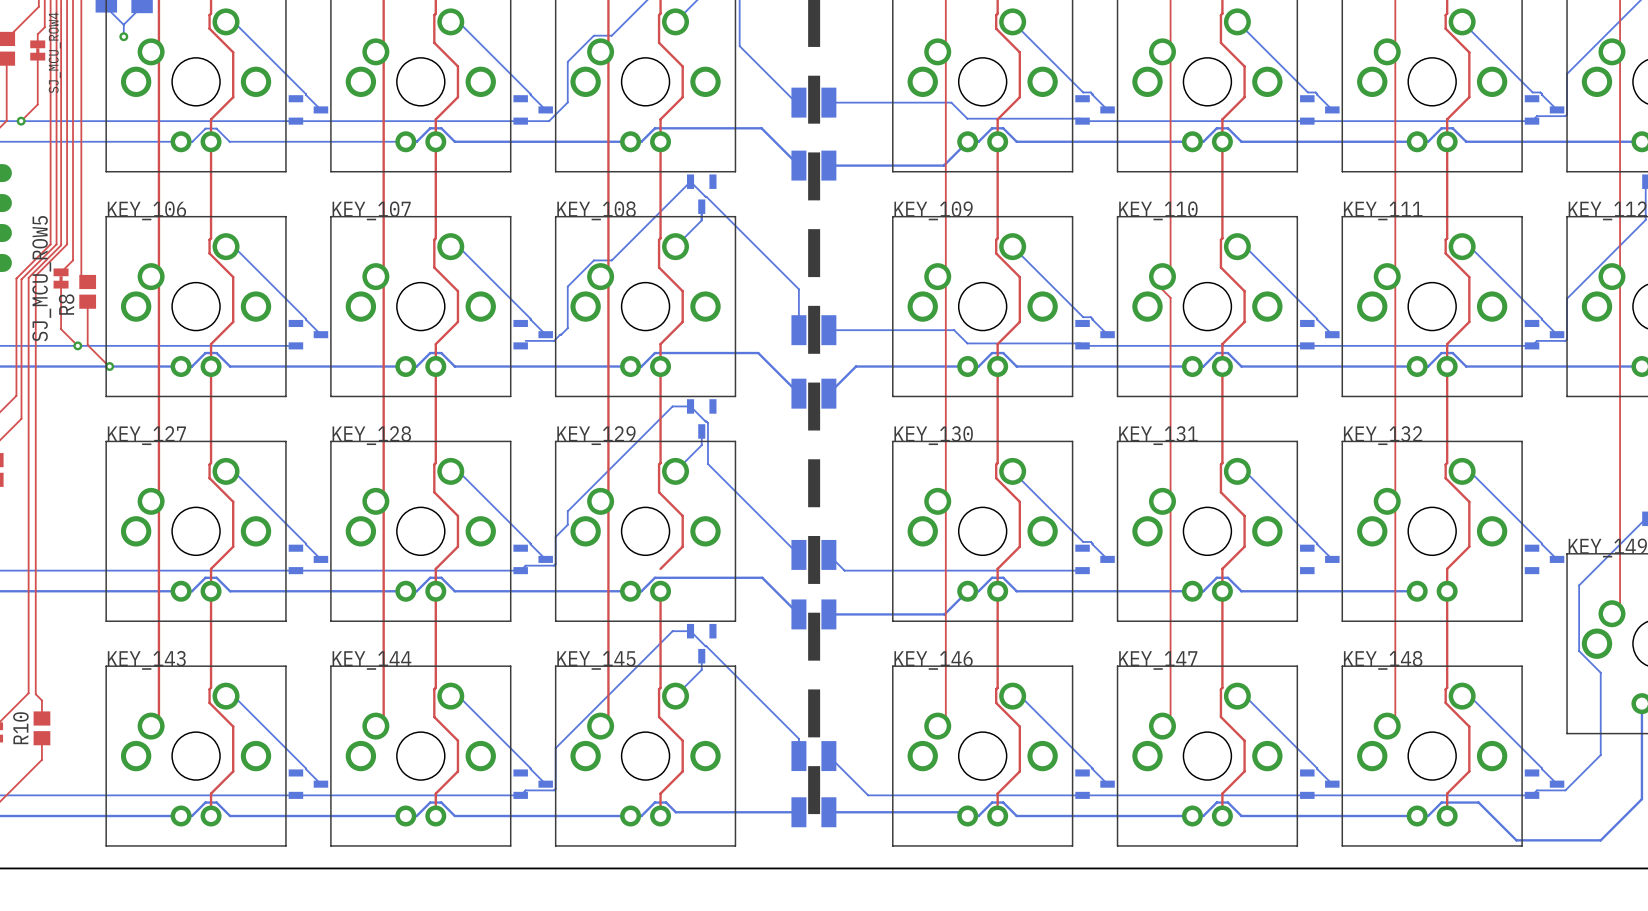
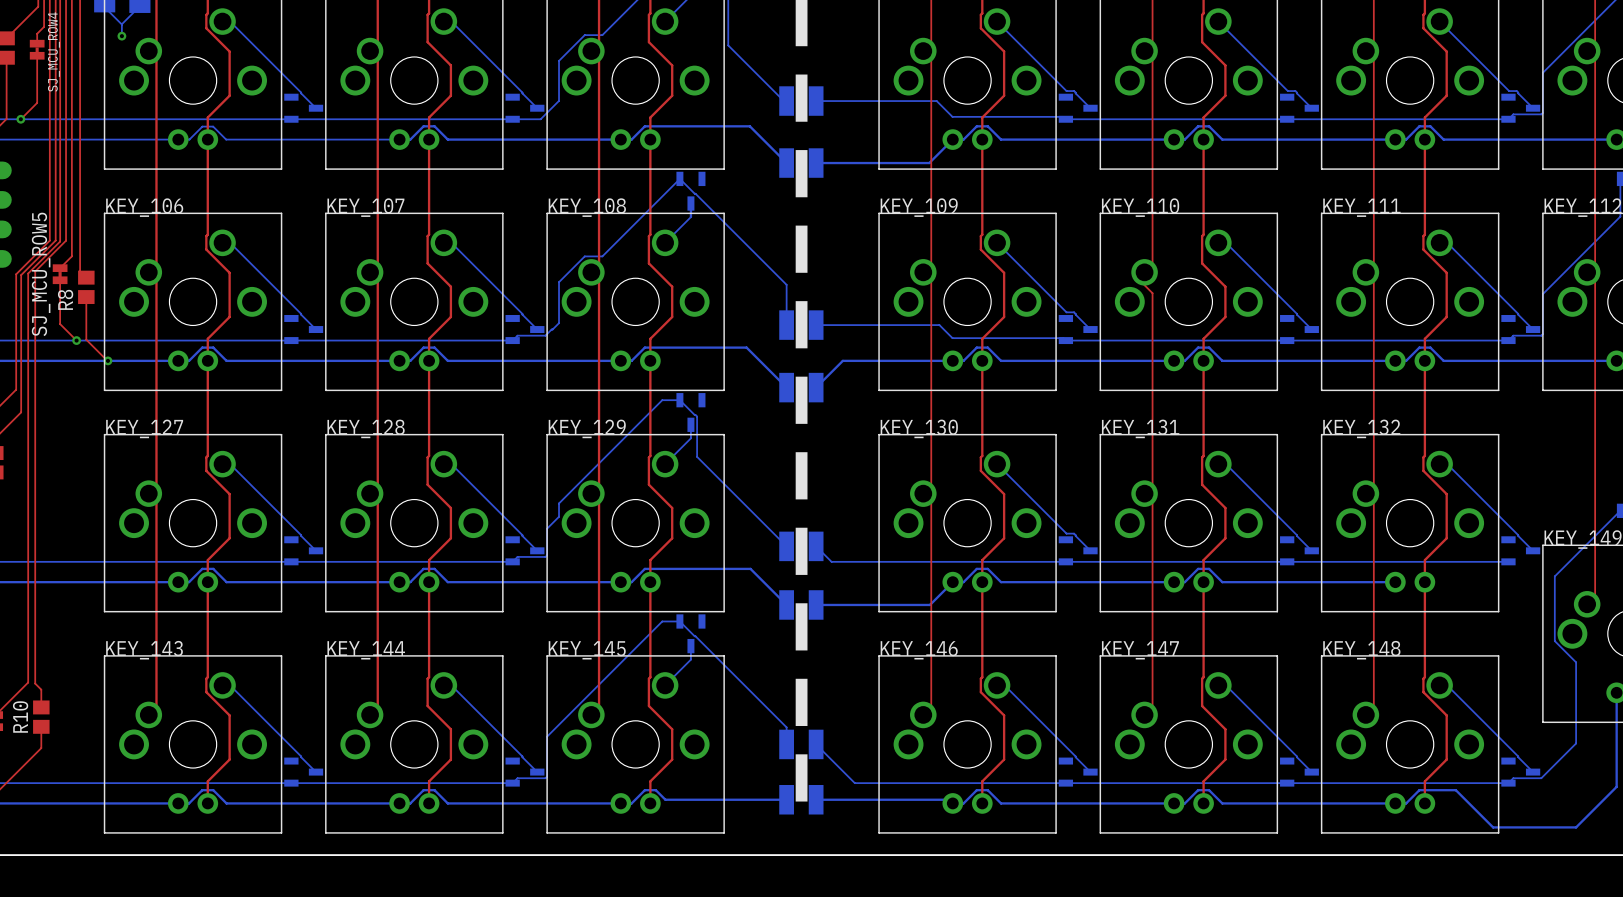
bottom track: none -> (517, 335) (512, 340) (291, 340)
top track: none -> (650, 560) (650, 582)
bottom track: none -> (1065, 561) (1508, 561)

